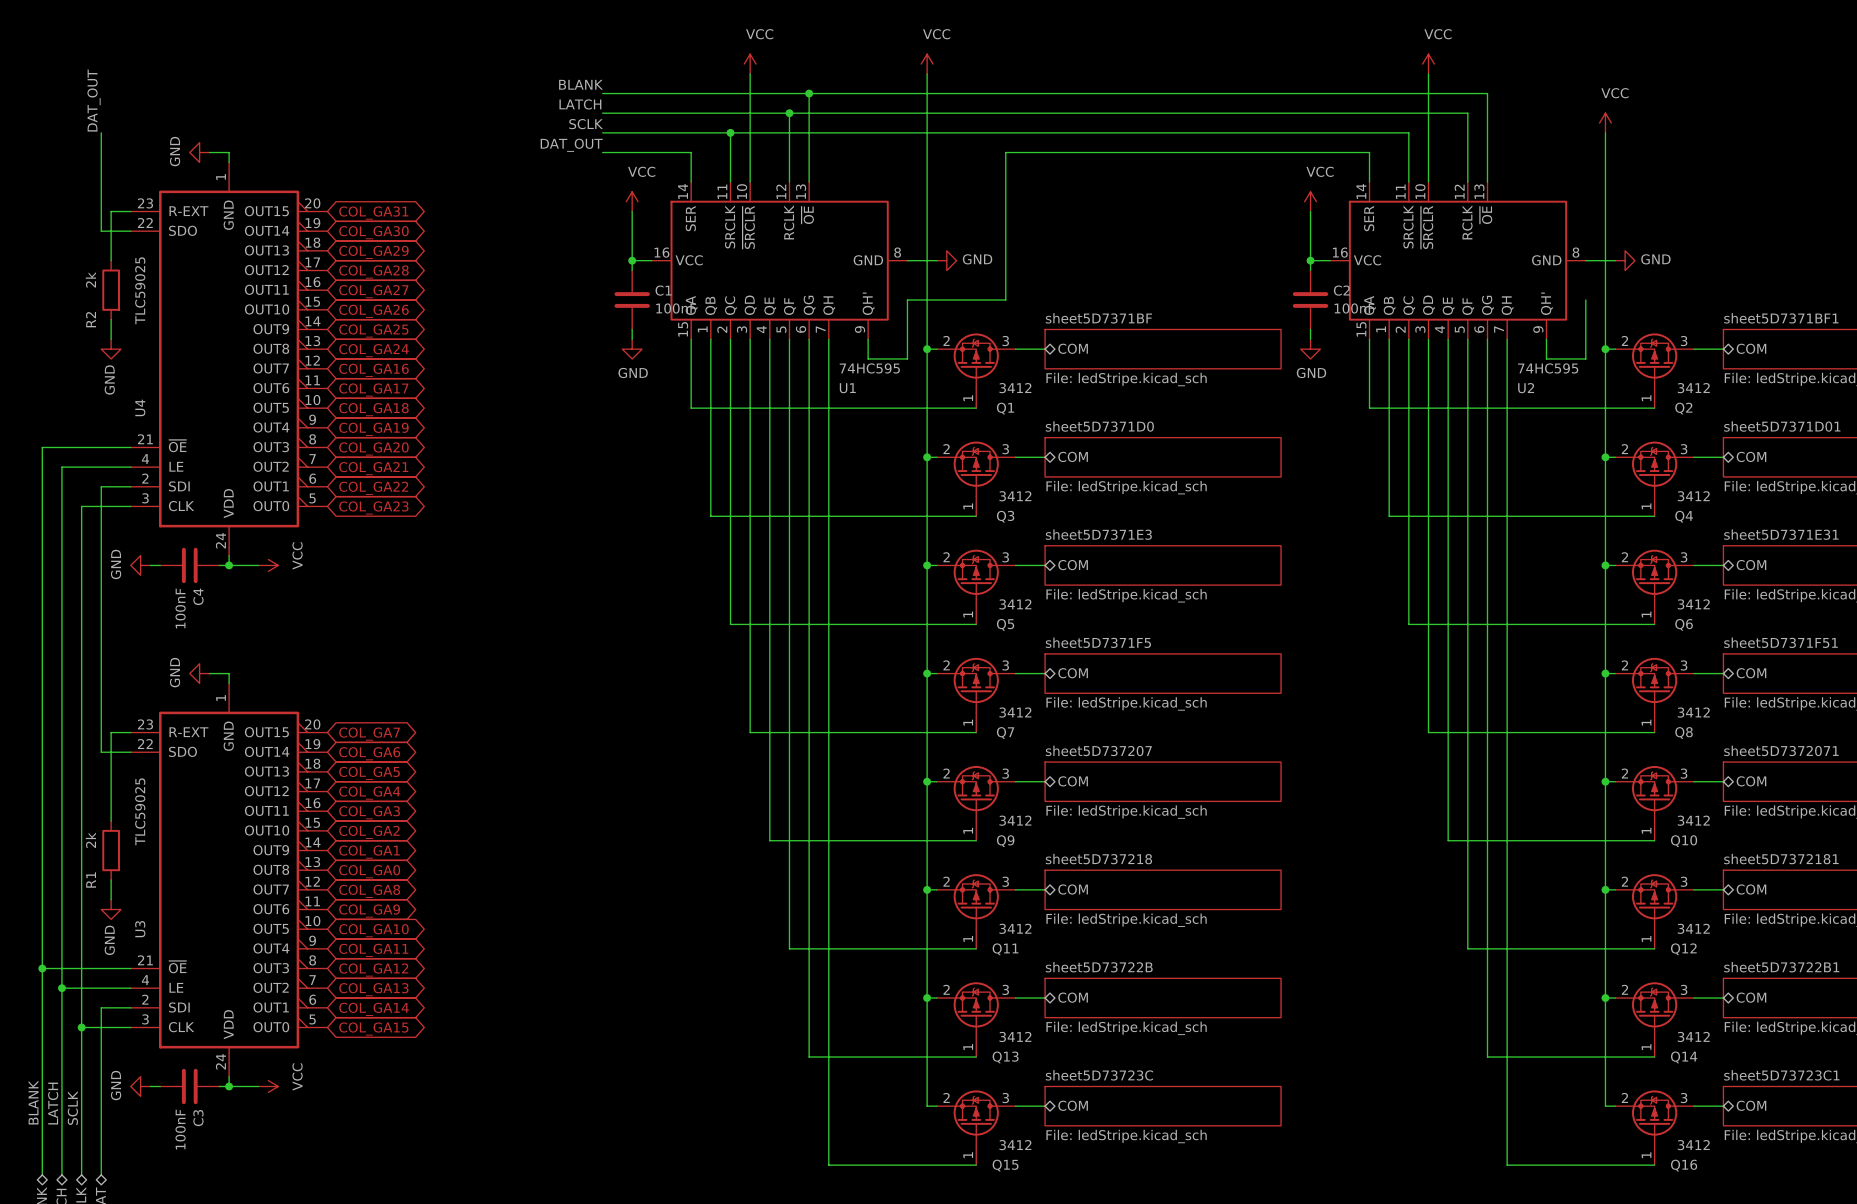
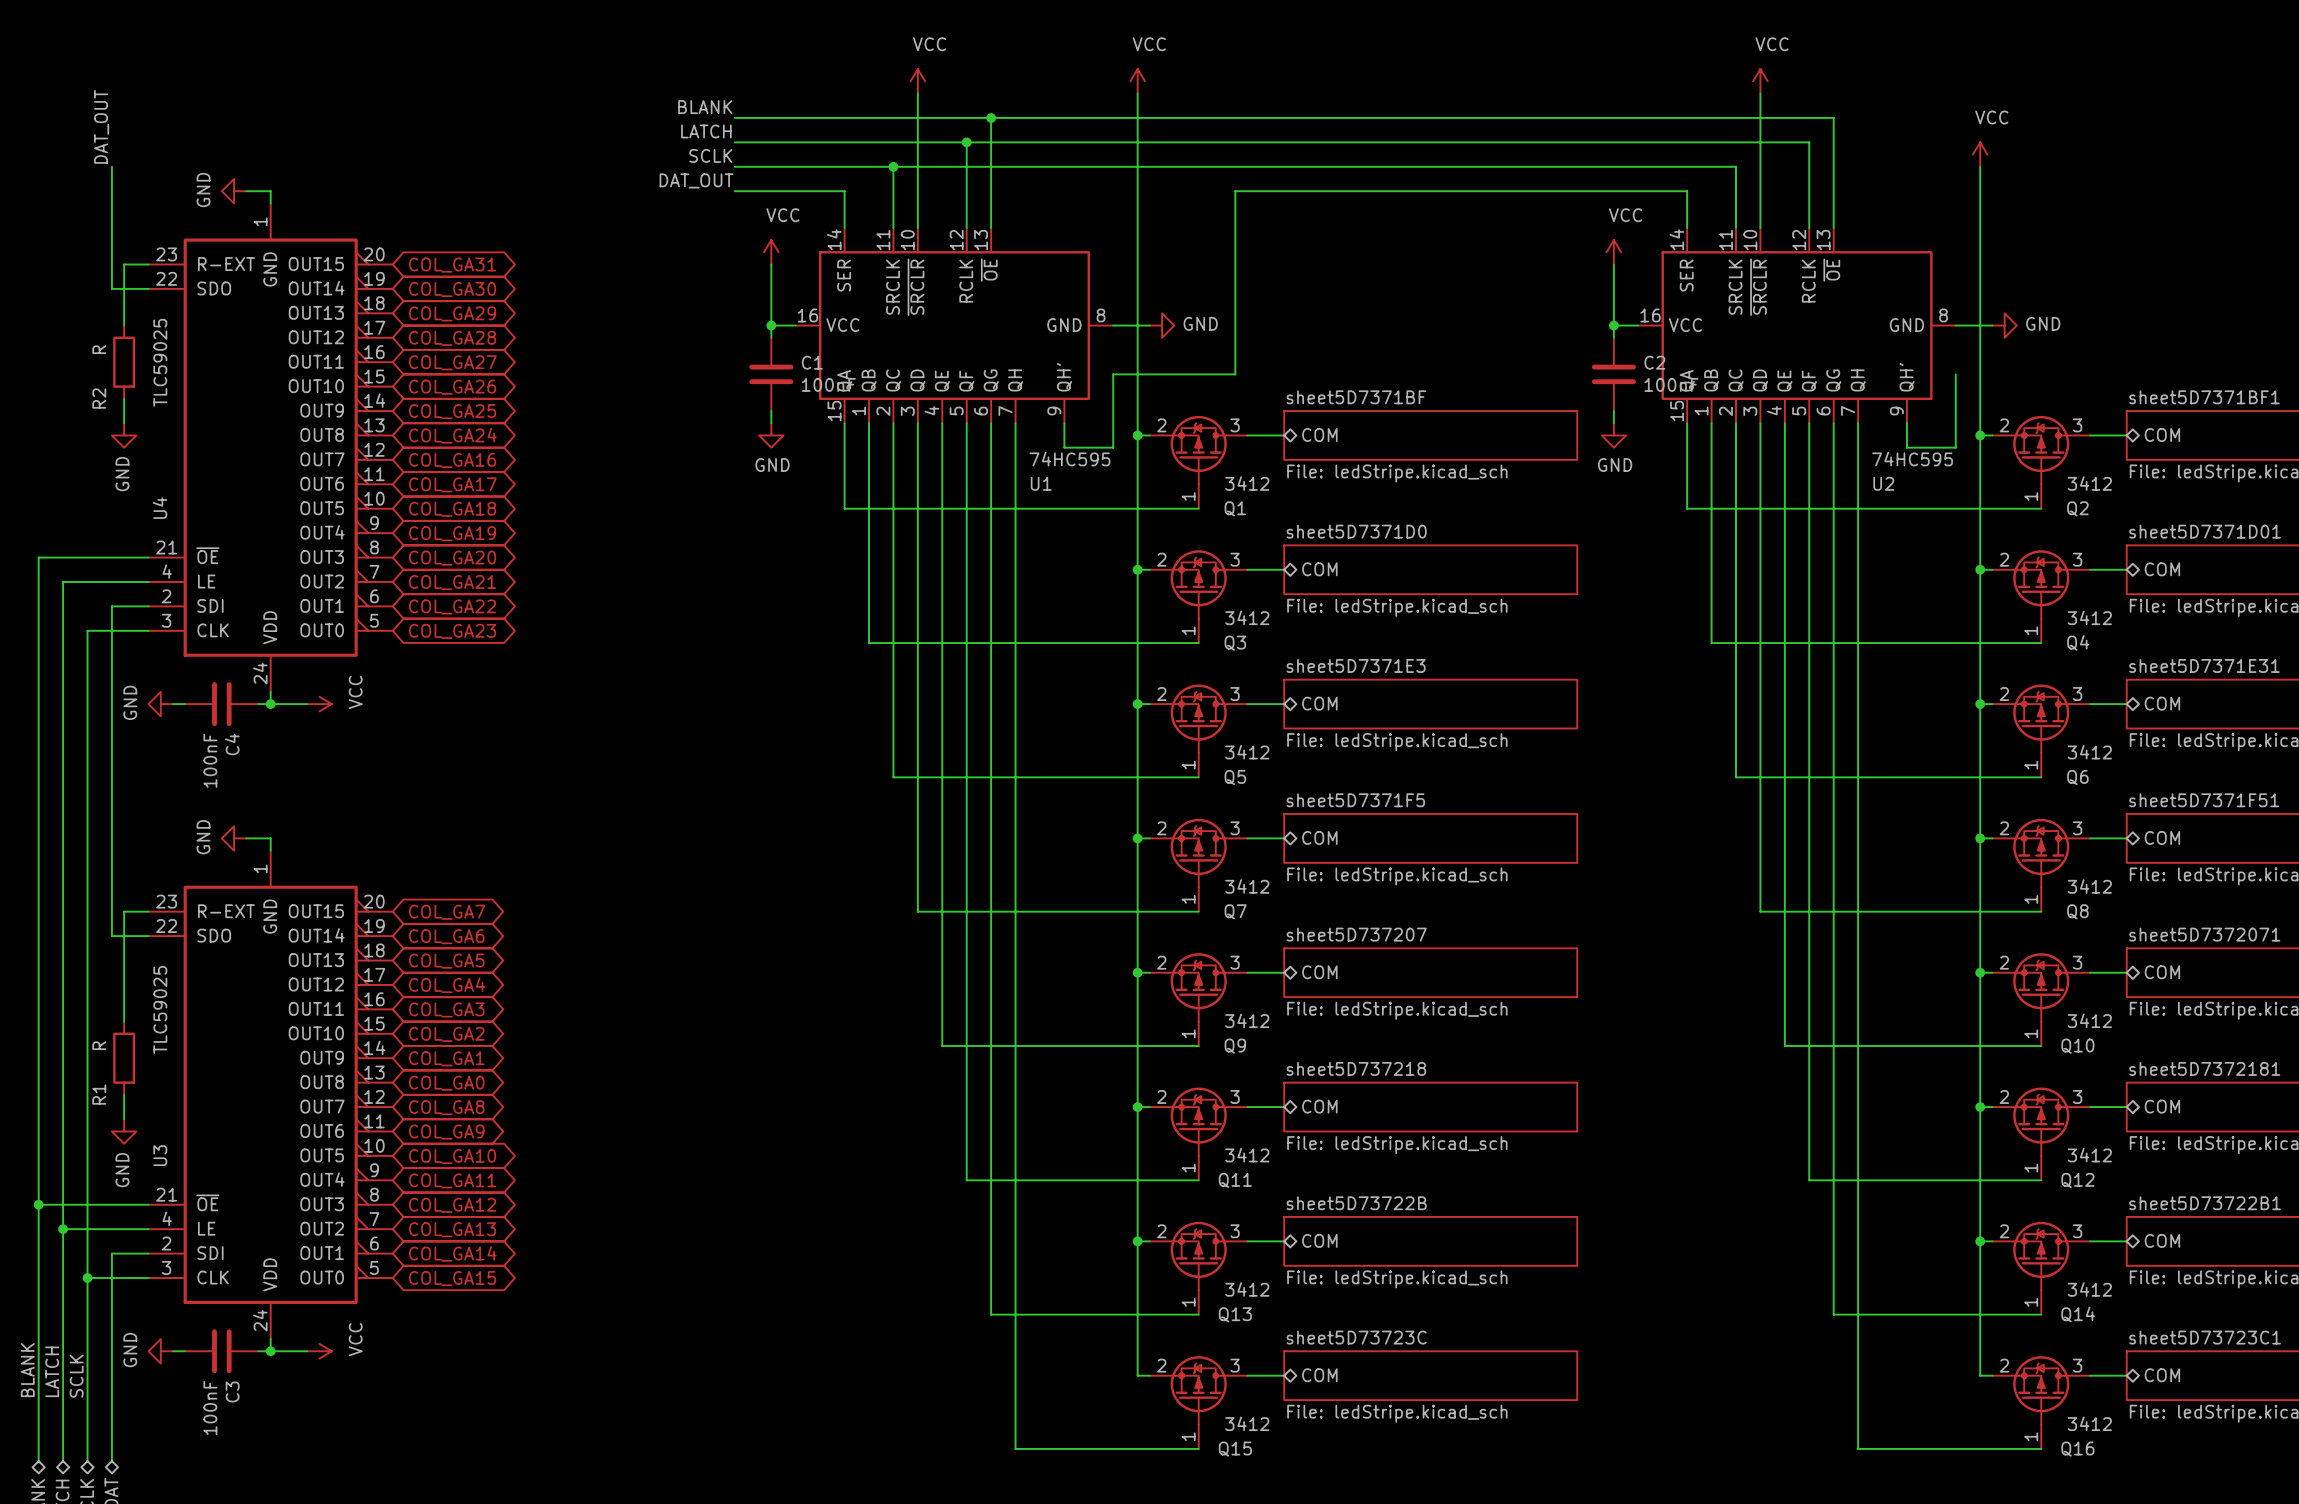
R2 value: 2k (90, 279) -> R (99, 349)
R1 value: 2k (90, 840) -> R (99, 1045)

